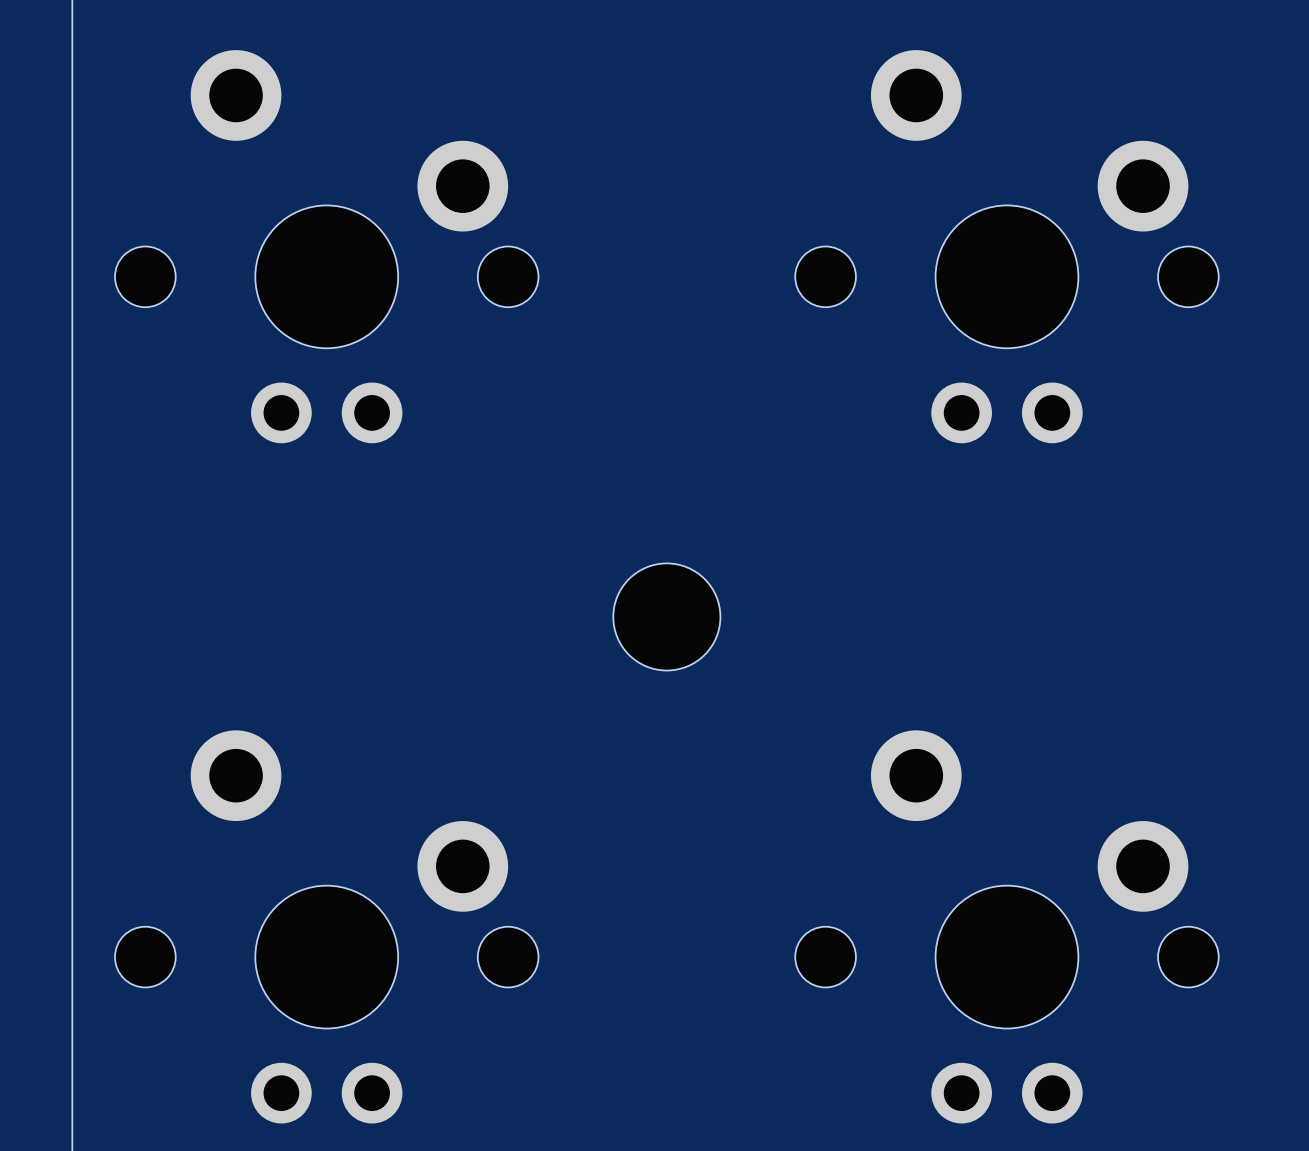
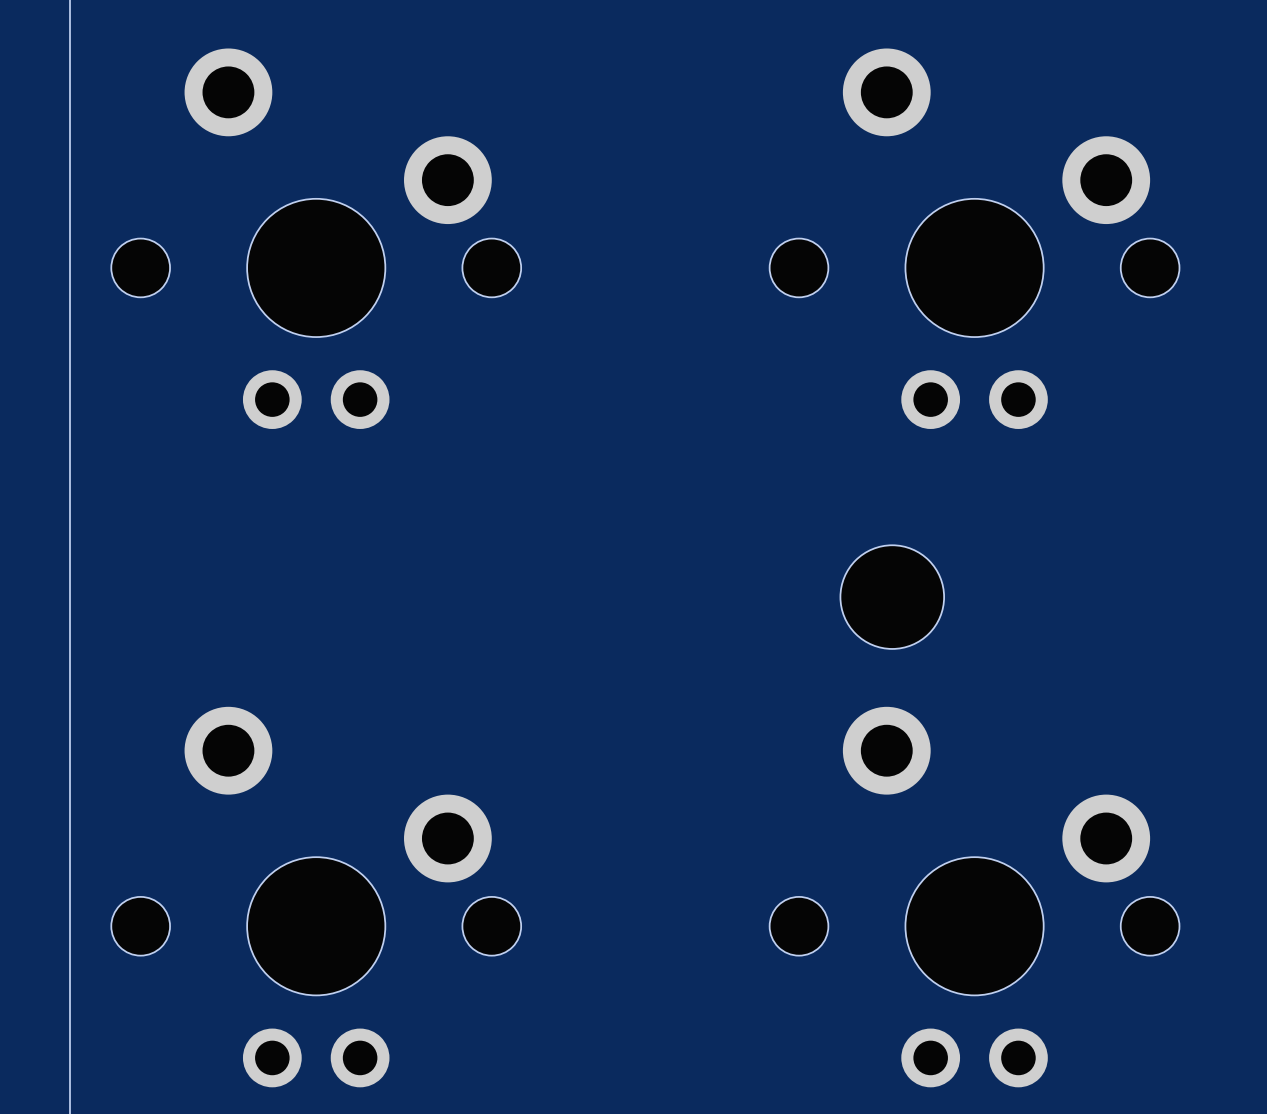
hole position: (666, 616) -> (892, 597)

